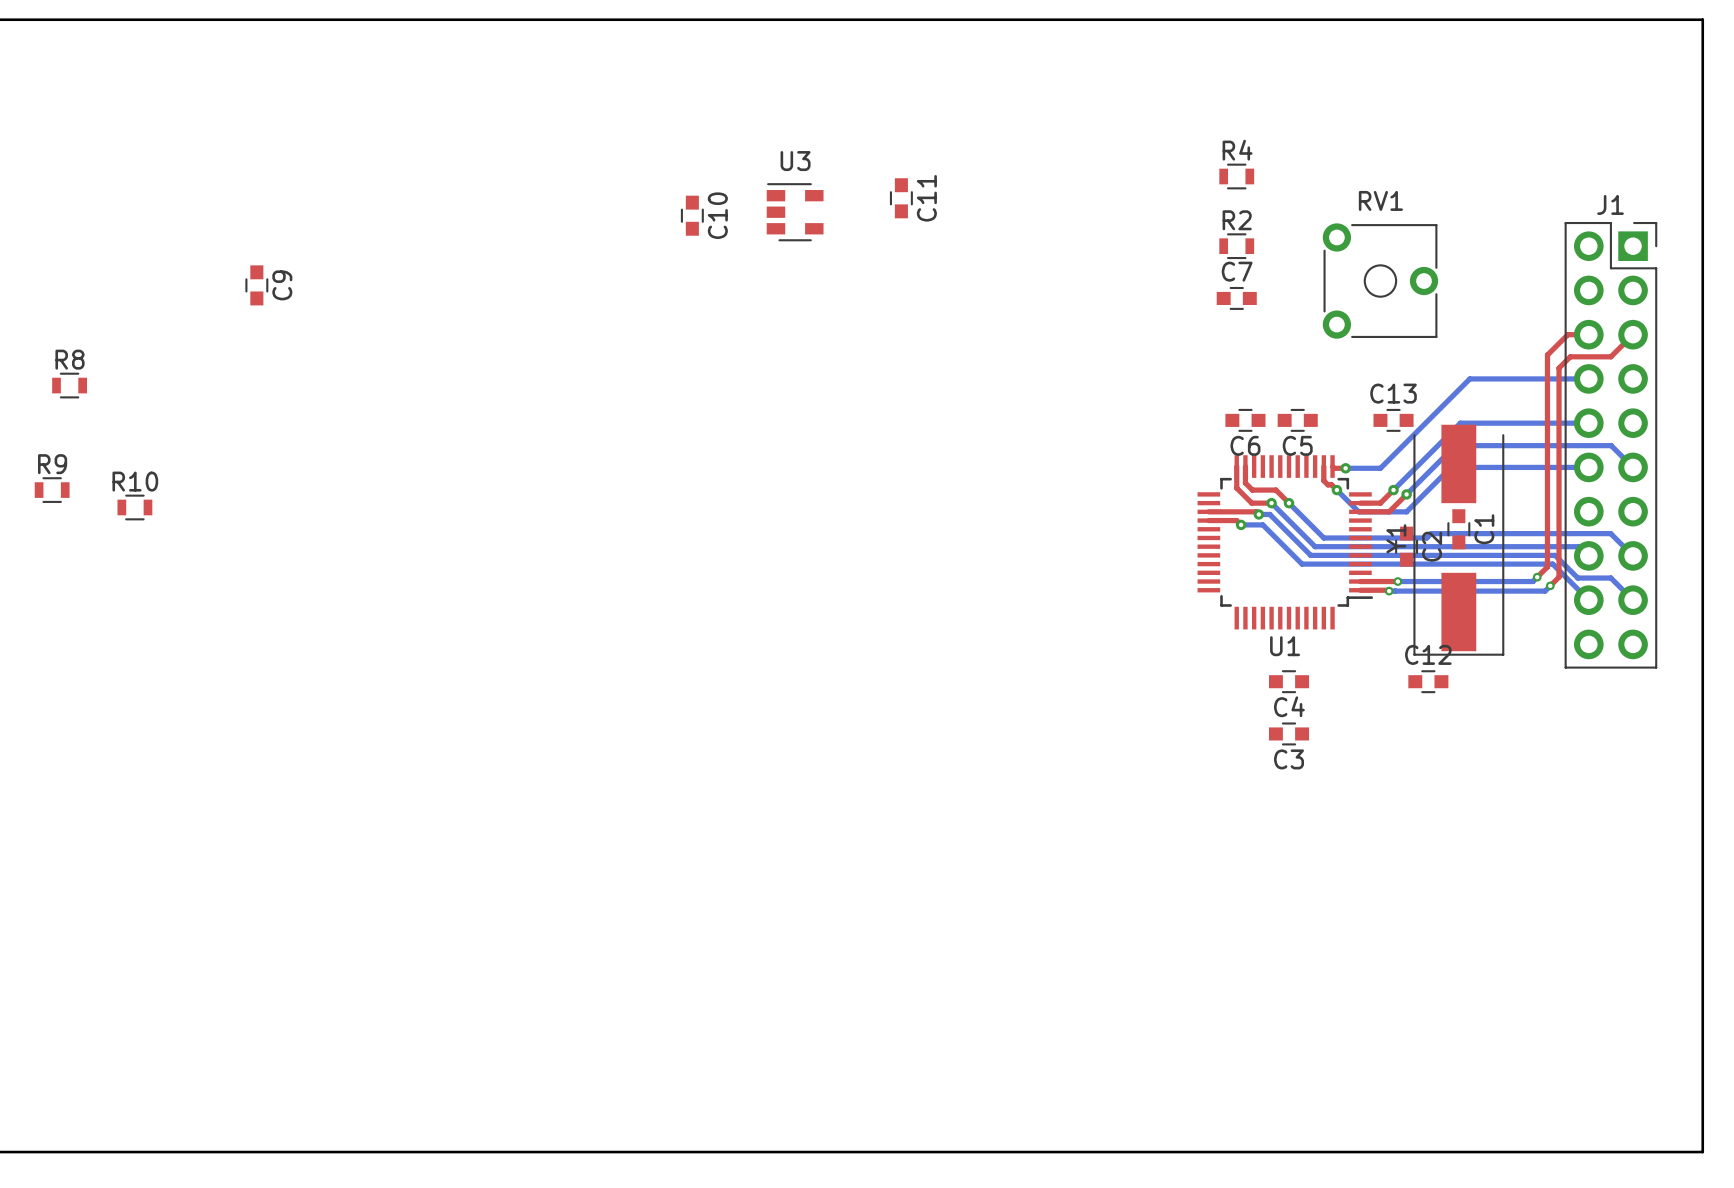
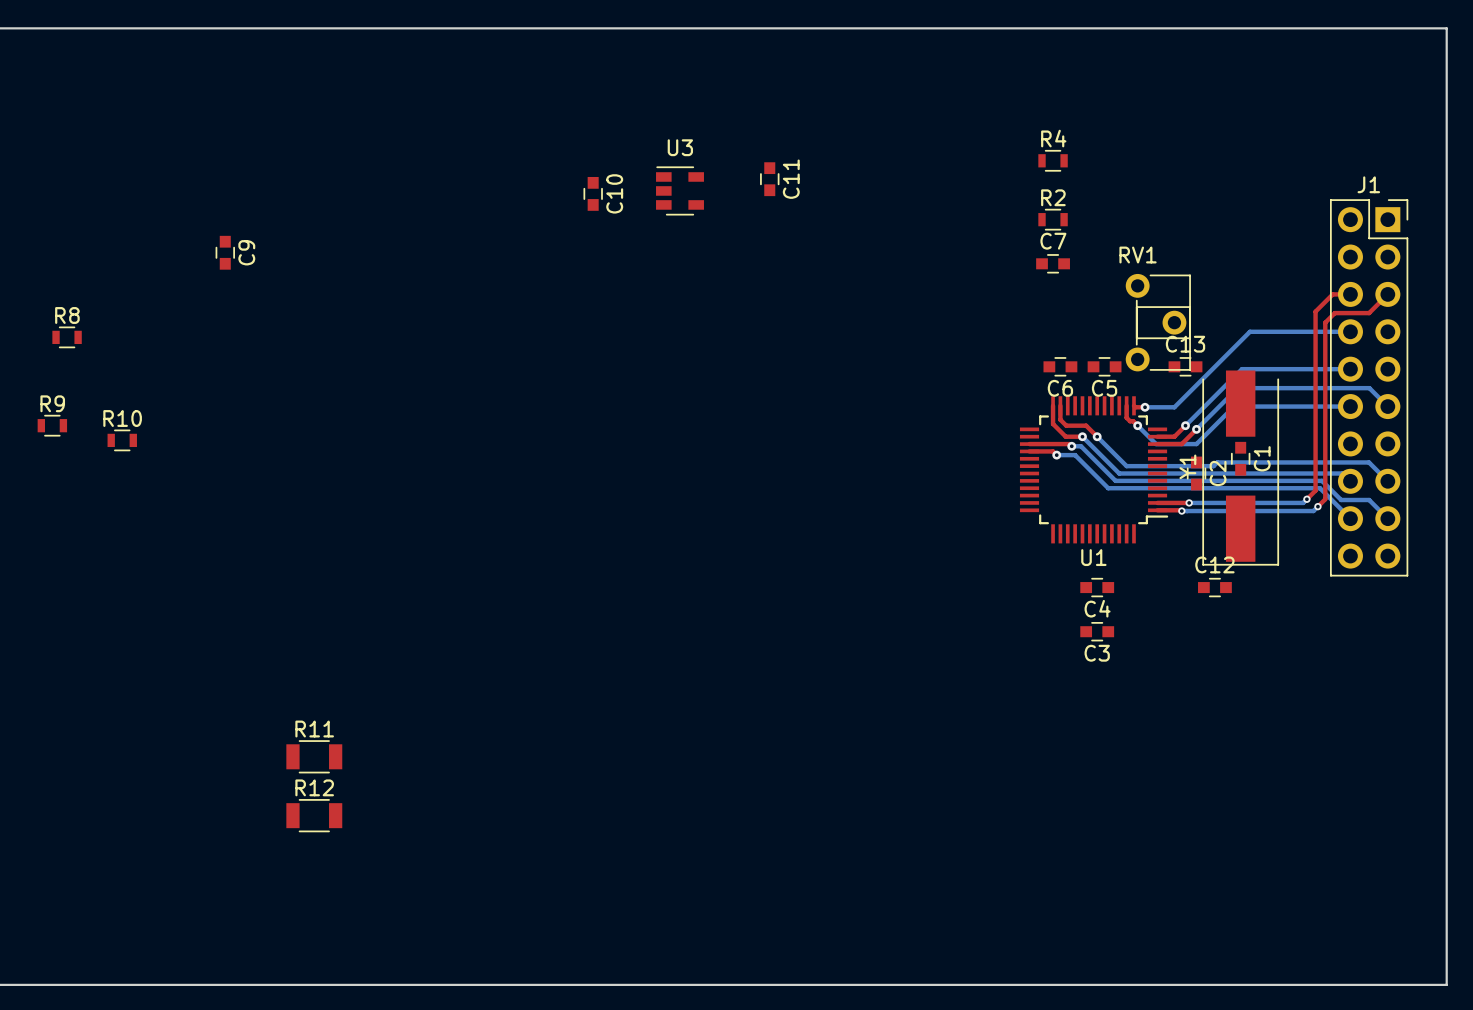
RV1 footprint: [1322, 223, 1439, 339] -> [1125, 273, 1191, 372]
R11: none -> (314, 756)
R12: none -> (314, 815)

